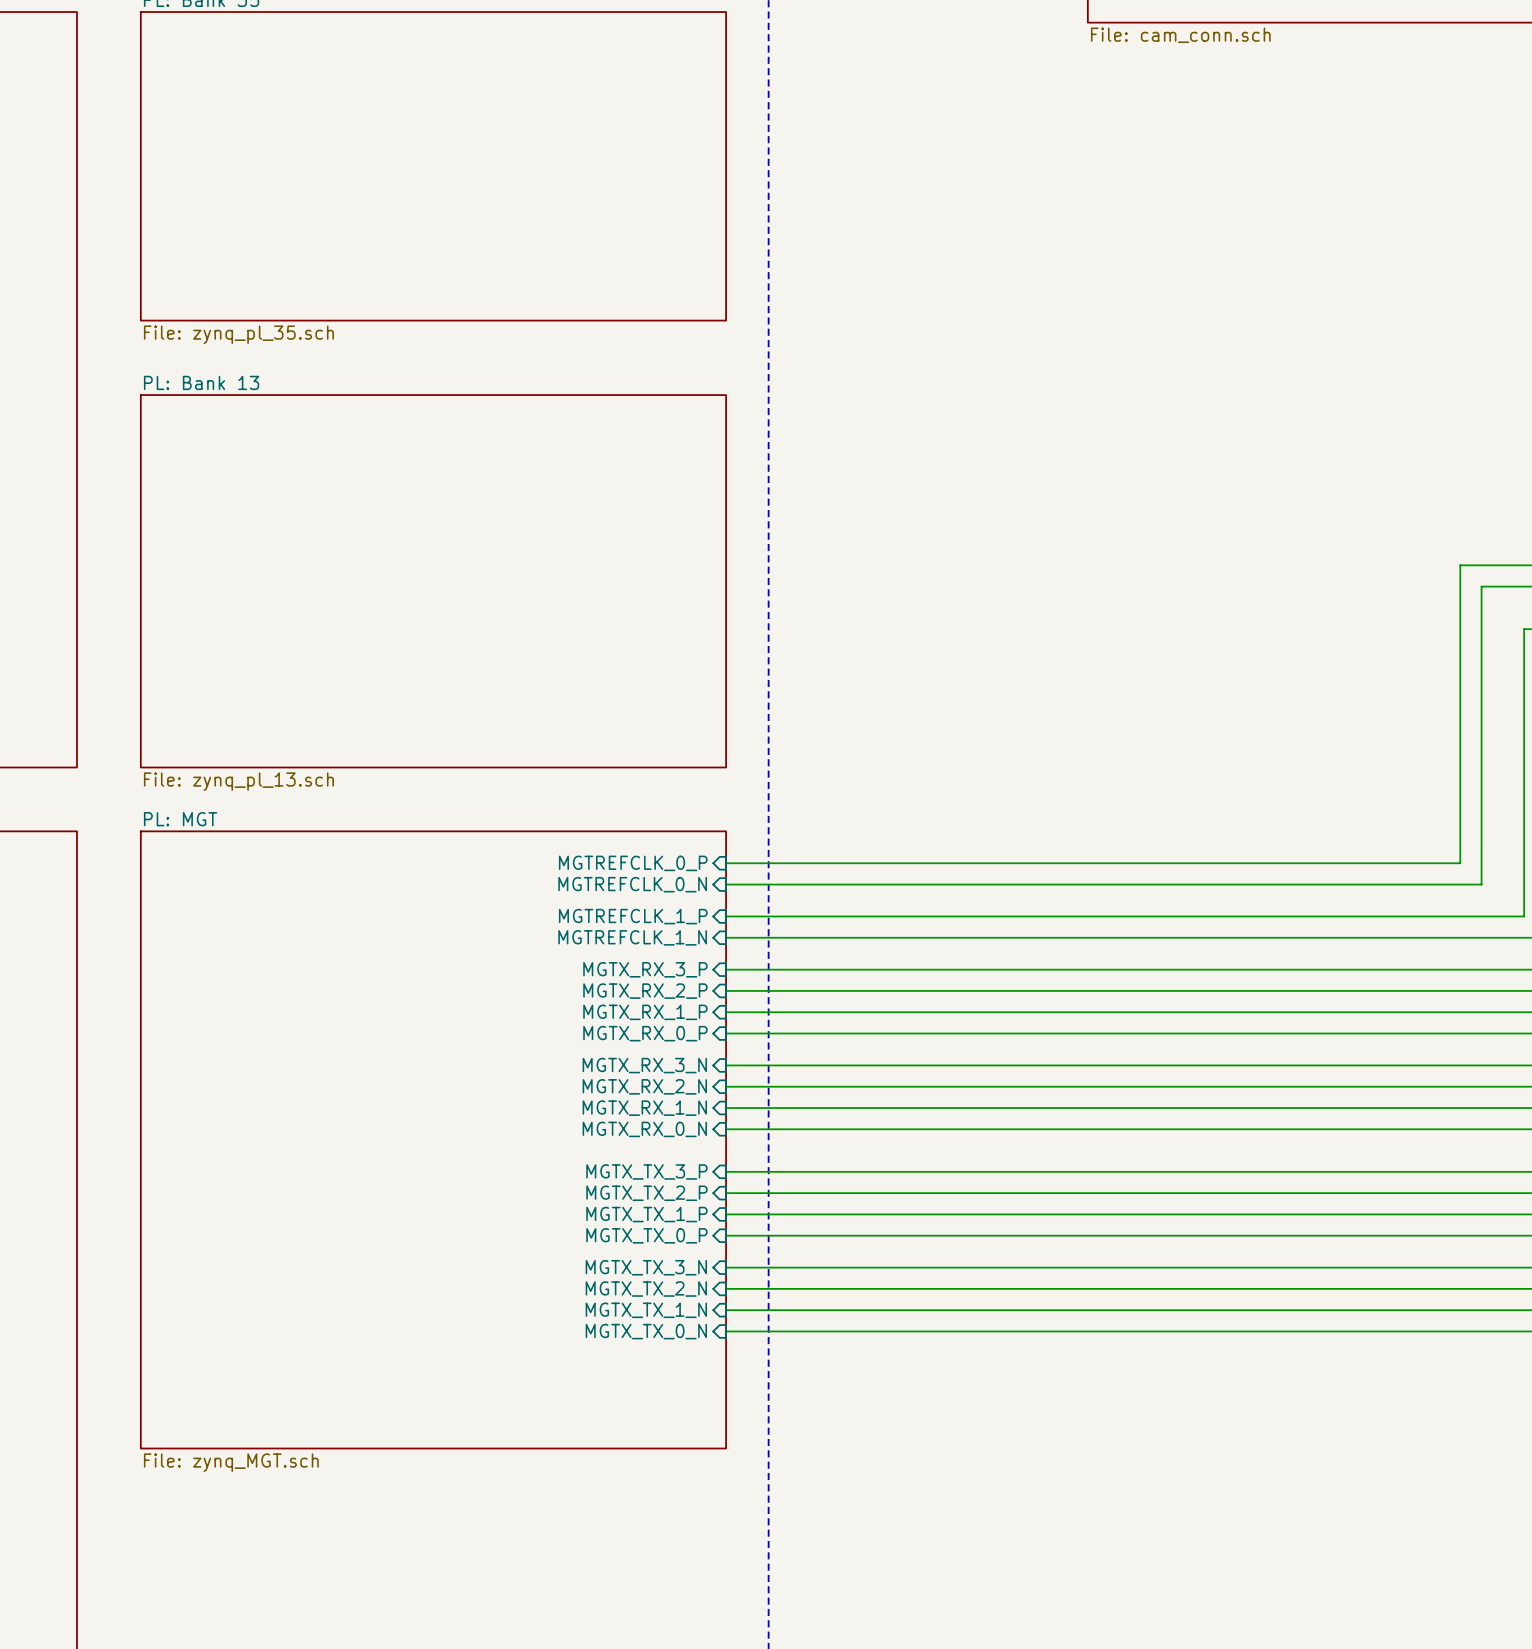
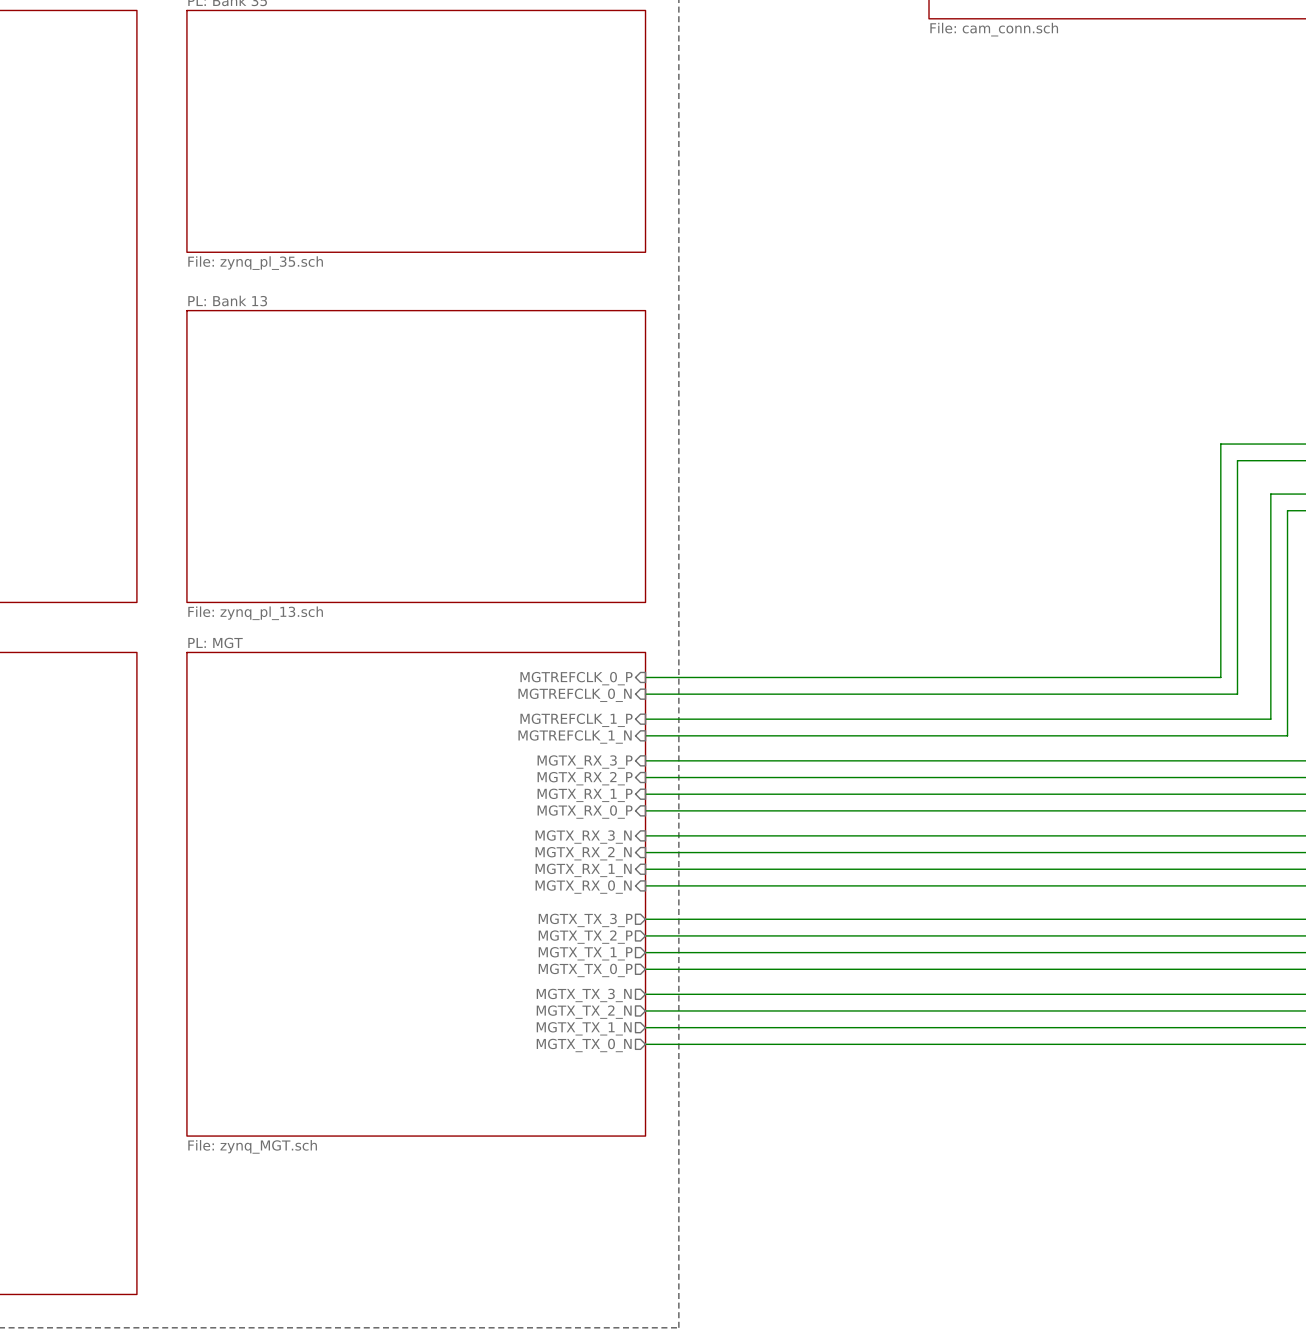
sheet pin shape: input (646, 1171) -> output (585, 920)
sheet pin shape: input (646, 1193) -> output (585, 937)
sheet pin shape: input (646, 1214) -> output (585, 953)
sheet pin shape: input (646, 1235) -> output (585, 970)
sheet pin shape: input (646, 1267) -> output (584, 995)
sheet pin shape: input (646, 1289) -> output (584, 1012)
sheet pin shape: input (646, 1310) -> output (584, 1028)
sheet pin shape: input (646, 1331) -> output (584, 1045)

